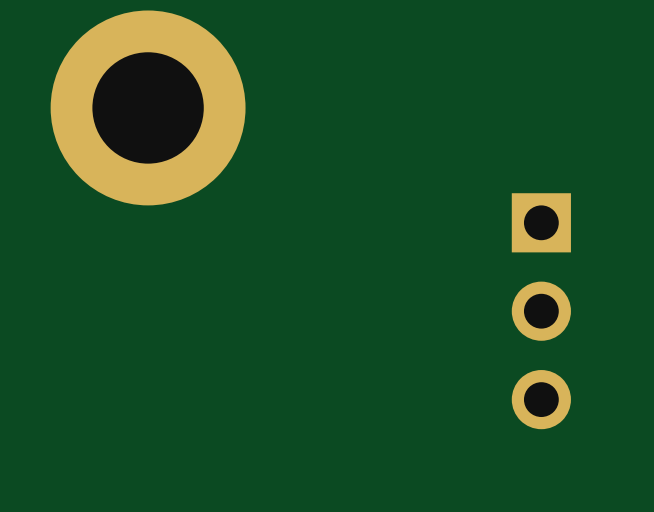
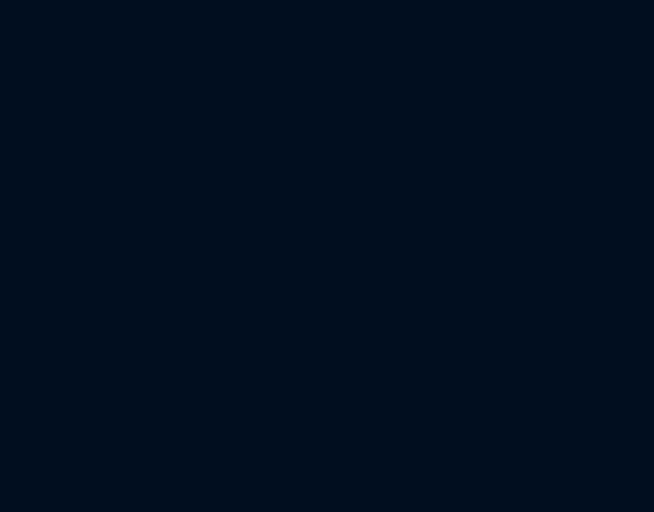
part: (148, 107) -> none
part: (541, 311) -> none

